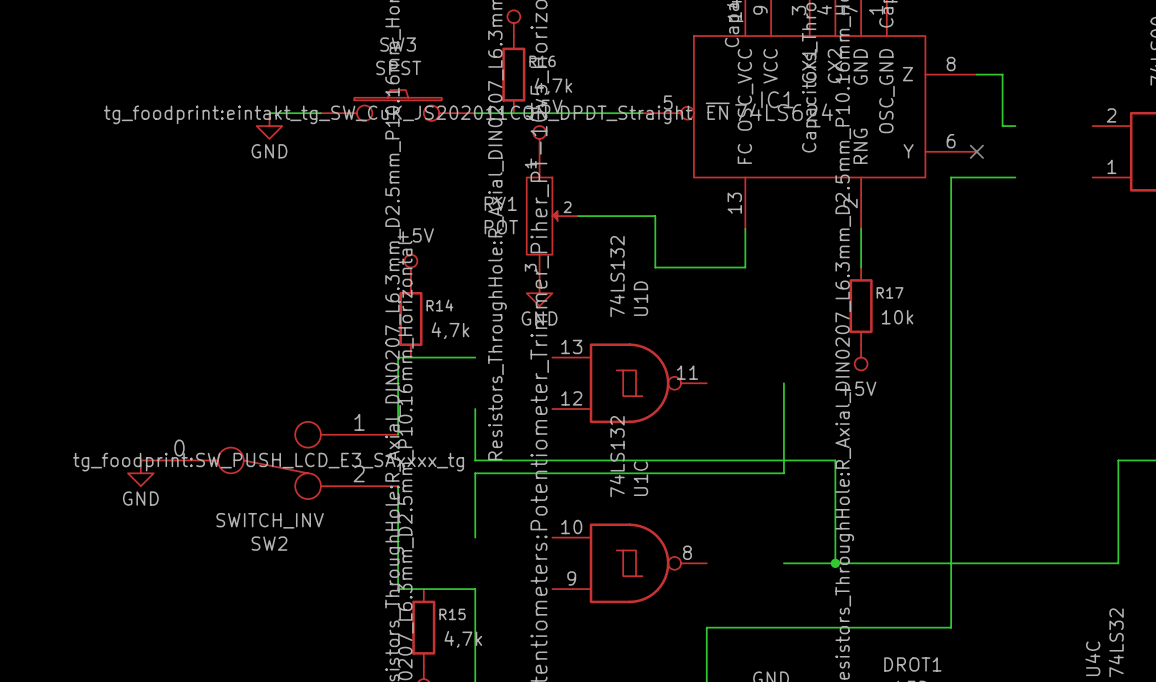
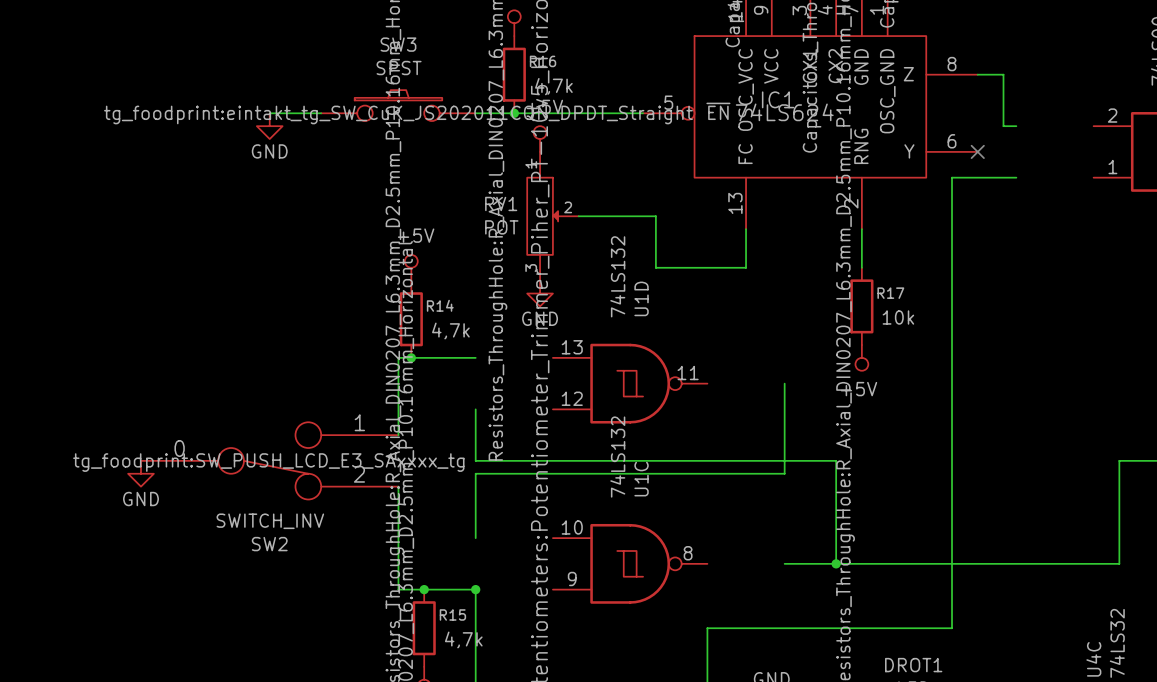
junction: none -> (514, 113)
junction: none -> (411, 357)
junction: none -> (424, 589)
junction: none -> (475, 589)

